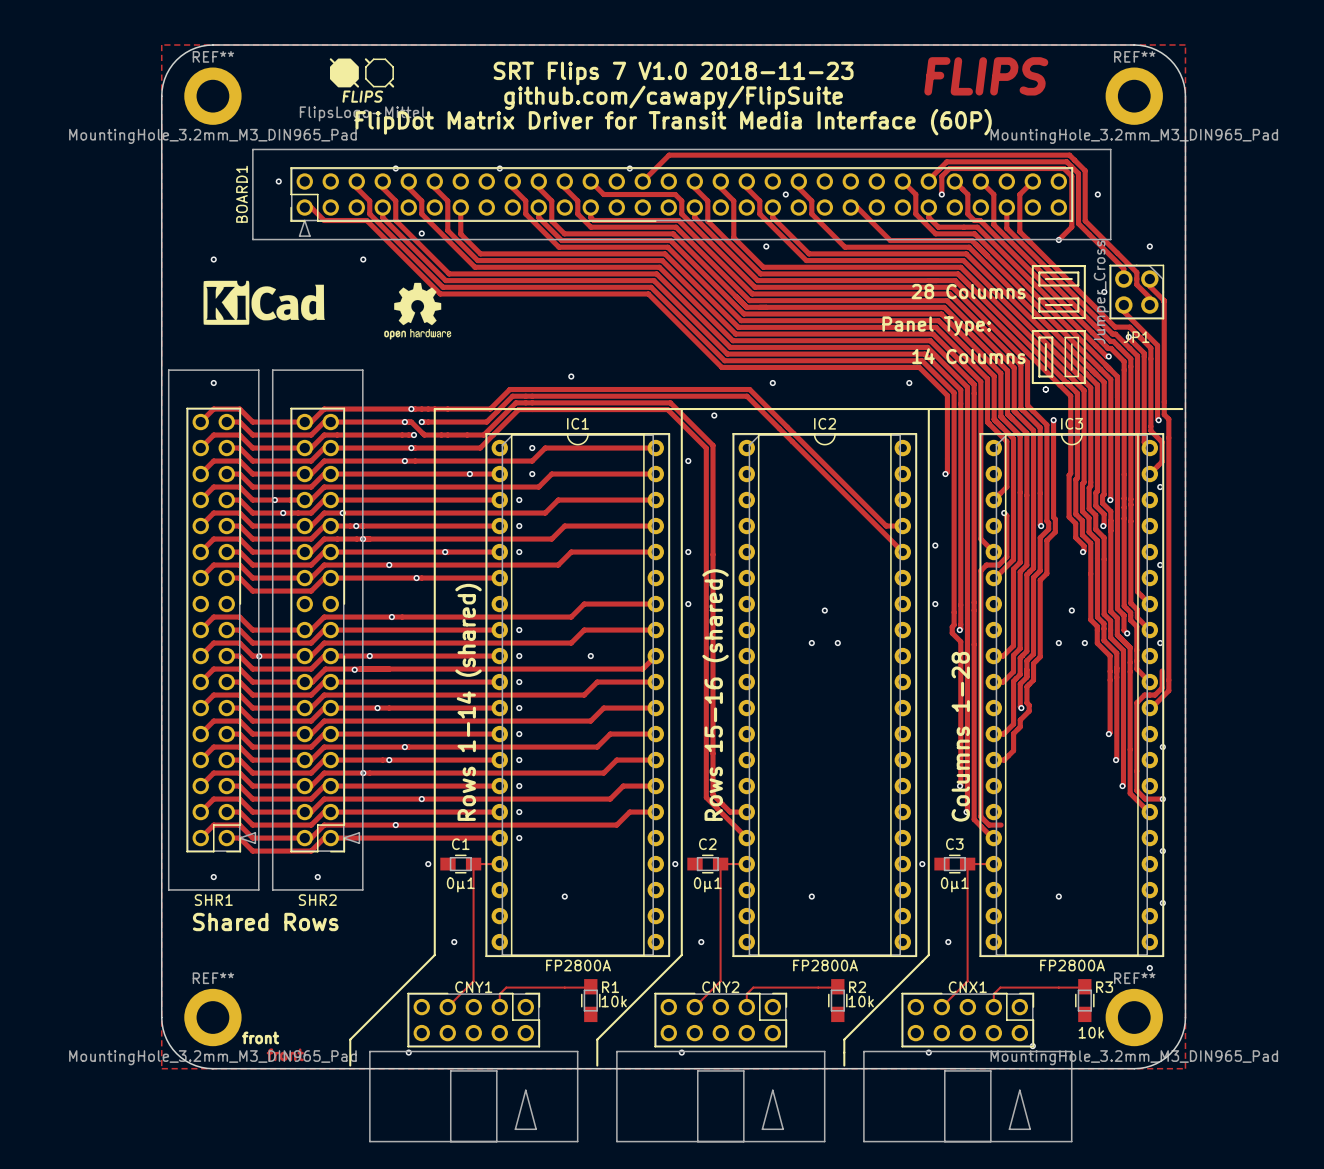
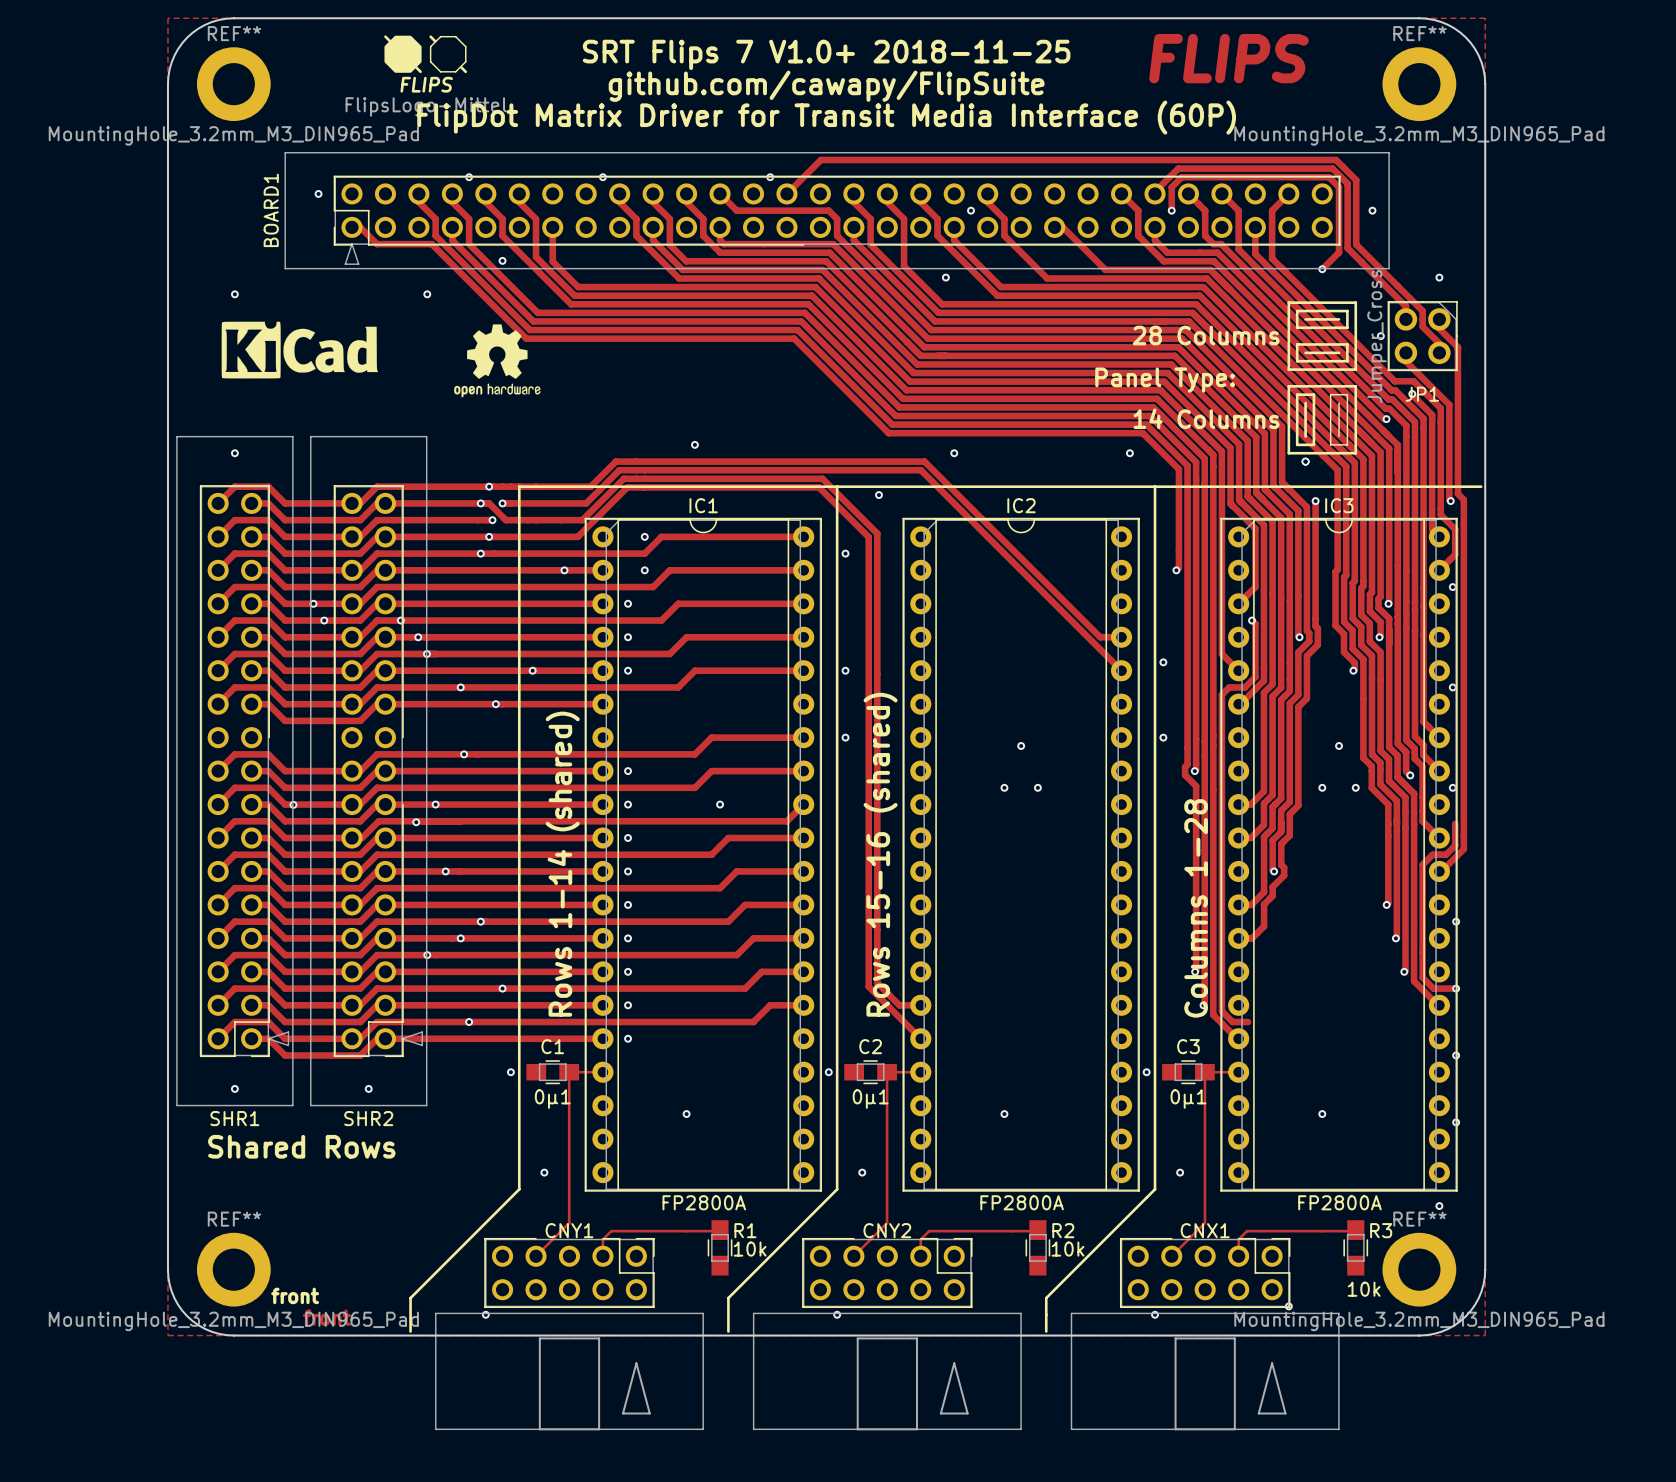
text: SRT Flips 7 V1.0 2018-11-23 (673, 73) -> SRT Flips 7 V1.0+ 2018-11-25 (826, 54)

